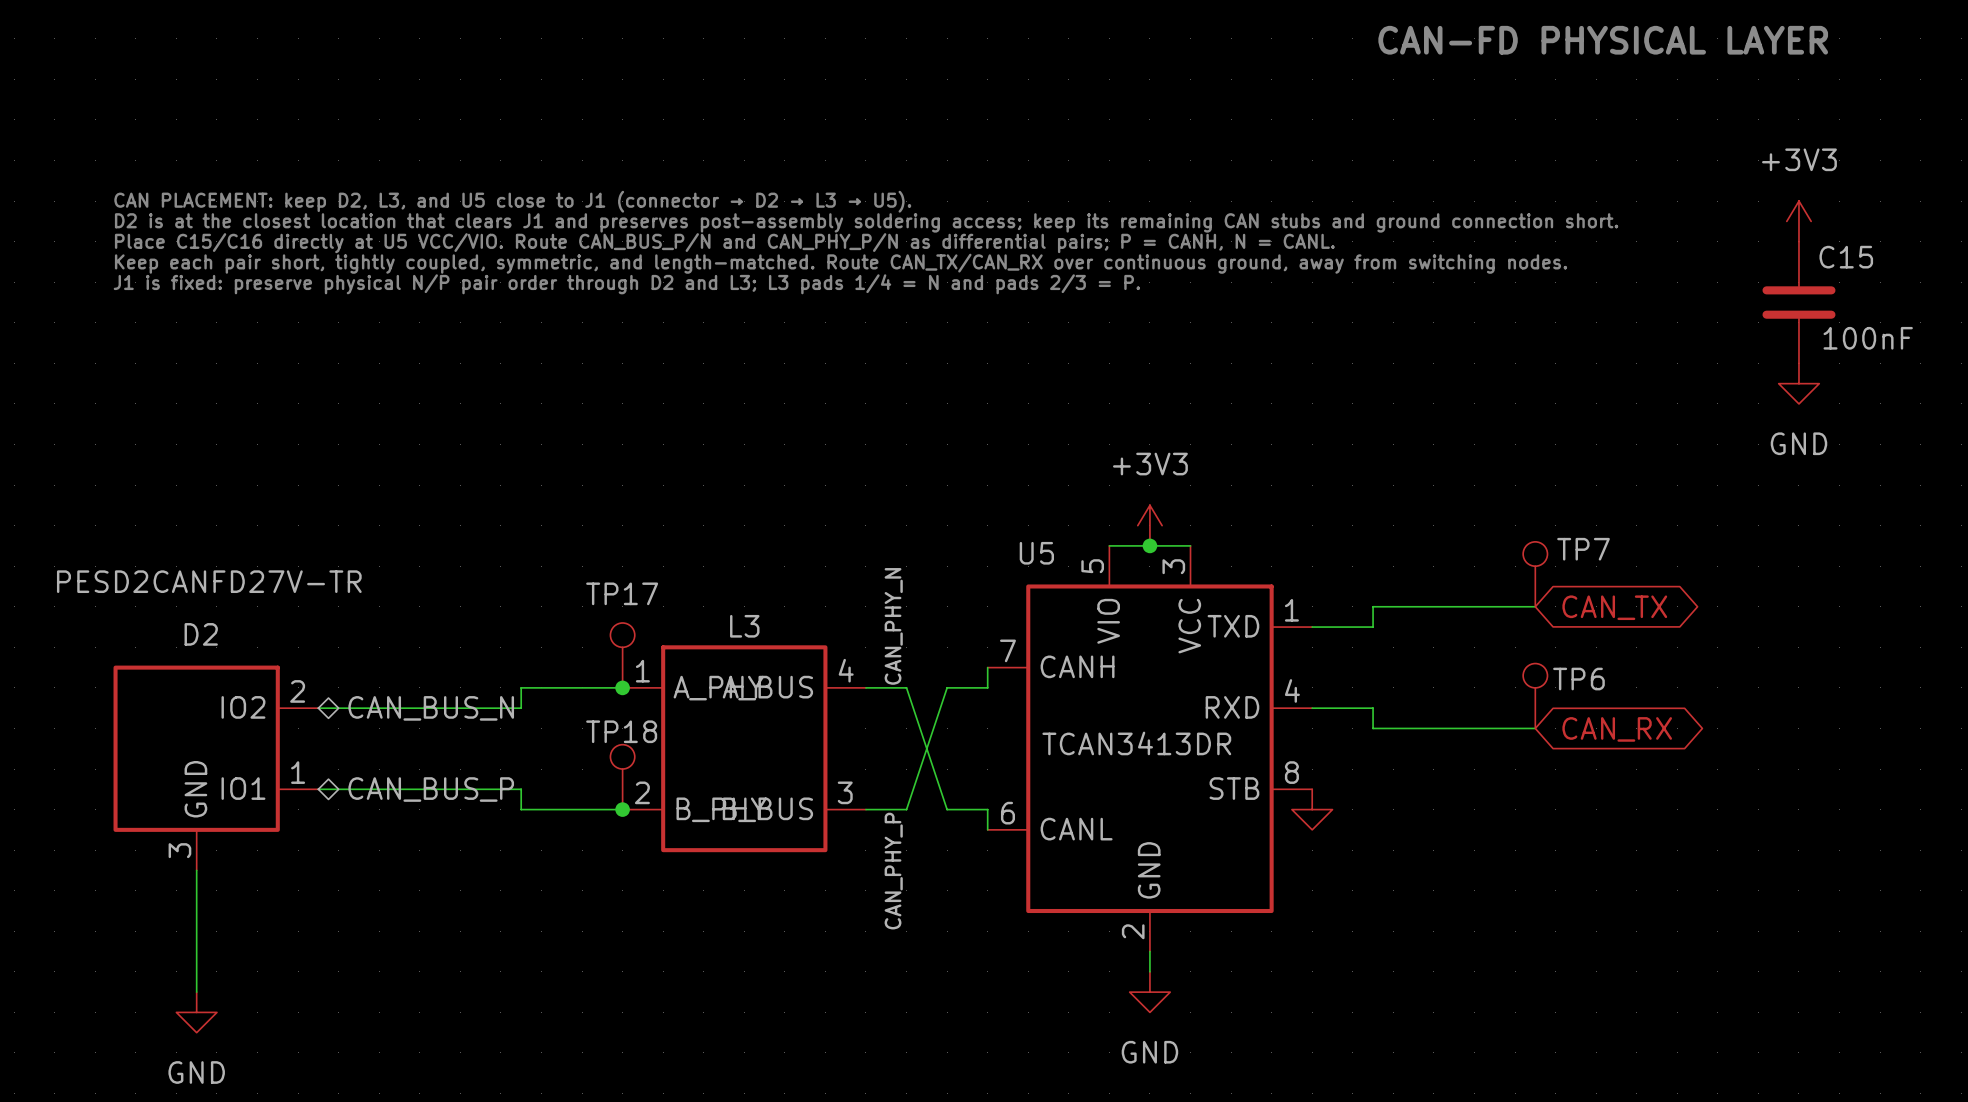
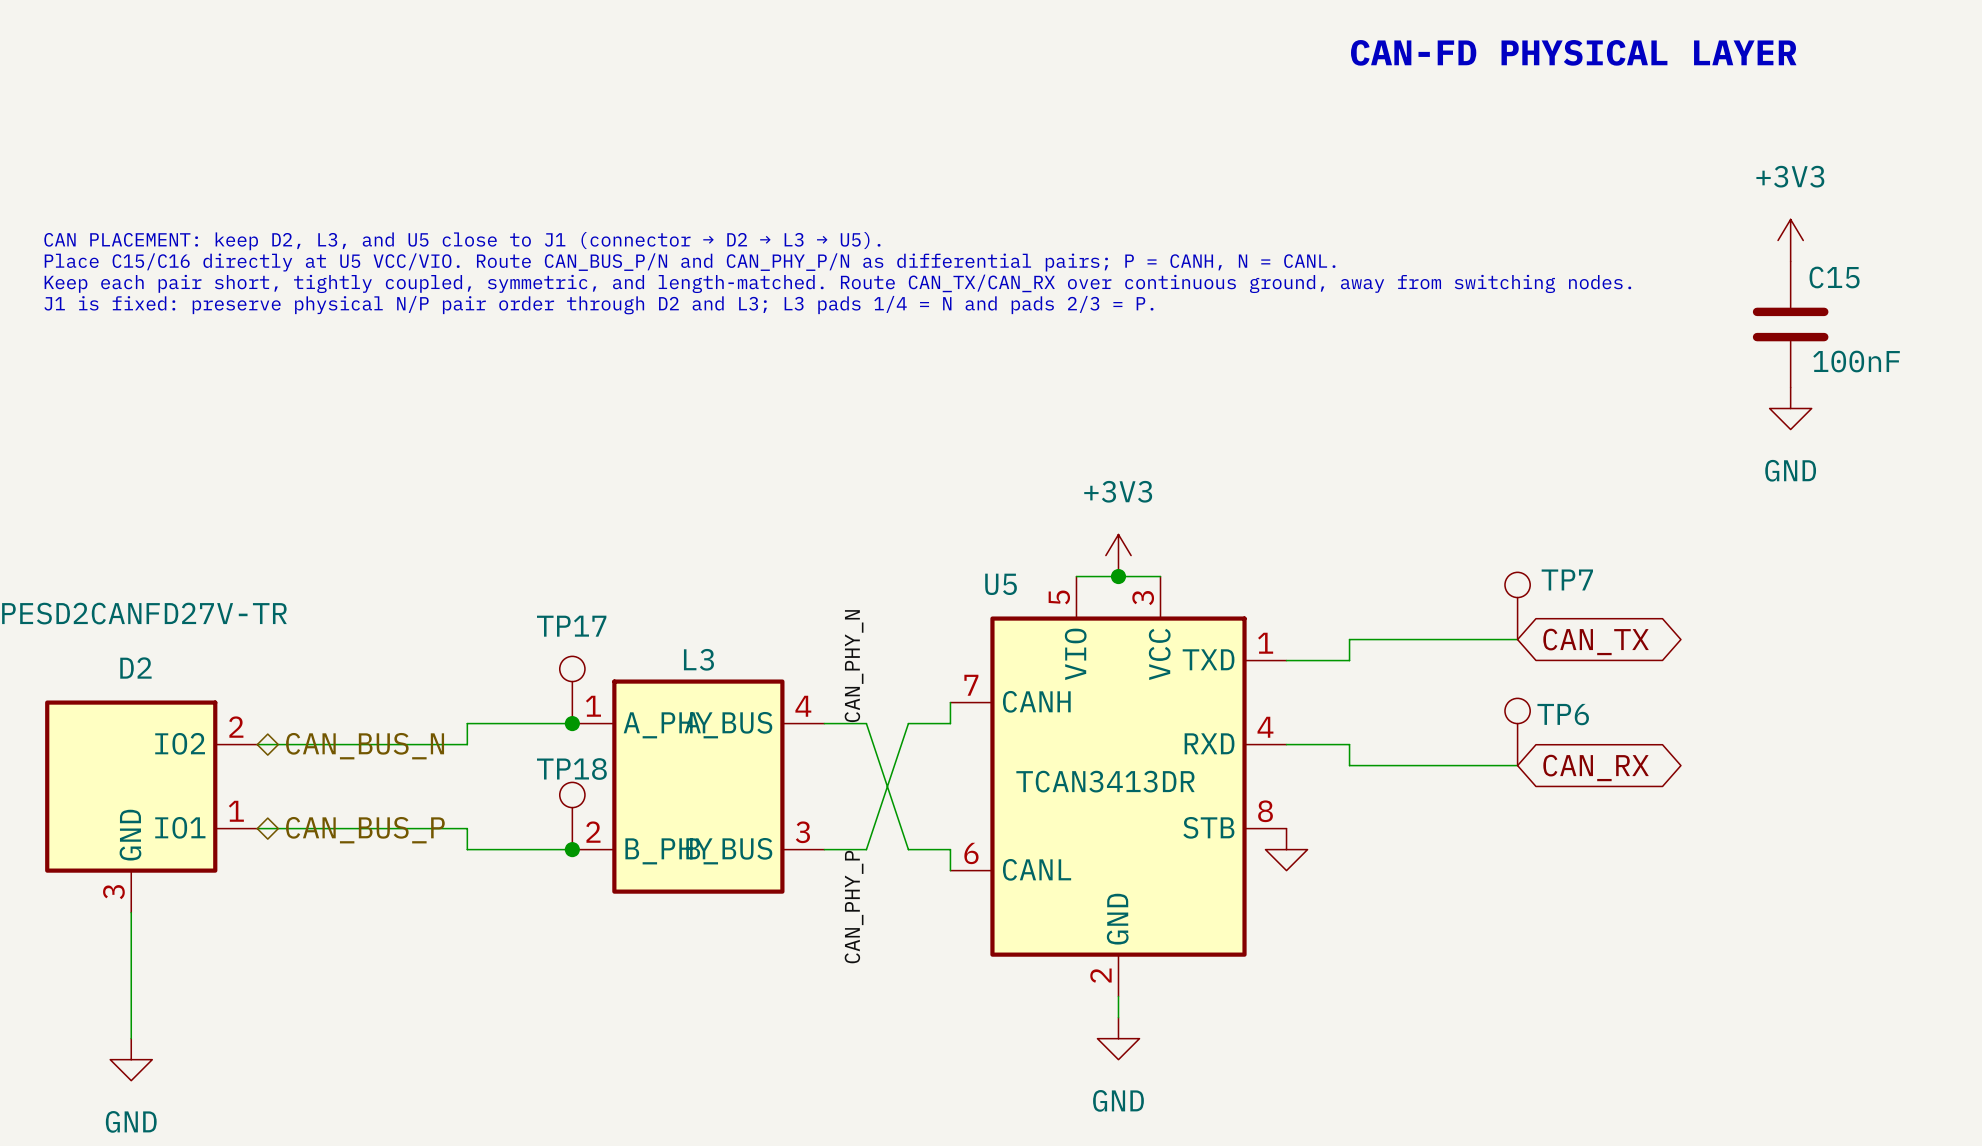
text: CAN PLACEMENT: keep D2, L3, and U5 close to J1 (connector → D2 → L3 → U5). (512, 201) -> none
text: D2 is at the closest location that clears J1 and preserves post-assembly soldering access; keep its remaining CAN stubs and ground connection short. (866, 222) -> CAN PLACEMENT: keep D2, L3, and U5 close to J1 (connector → D2 → L3 → U5). (462, 241)

